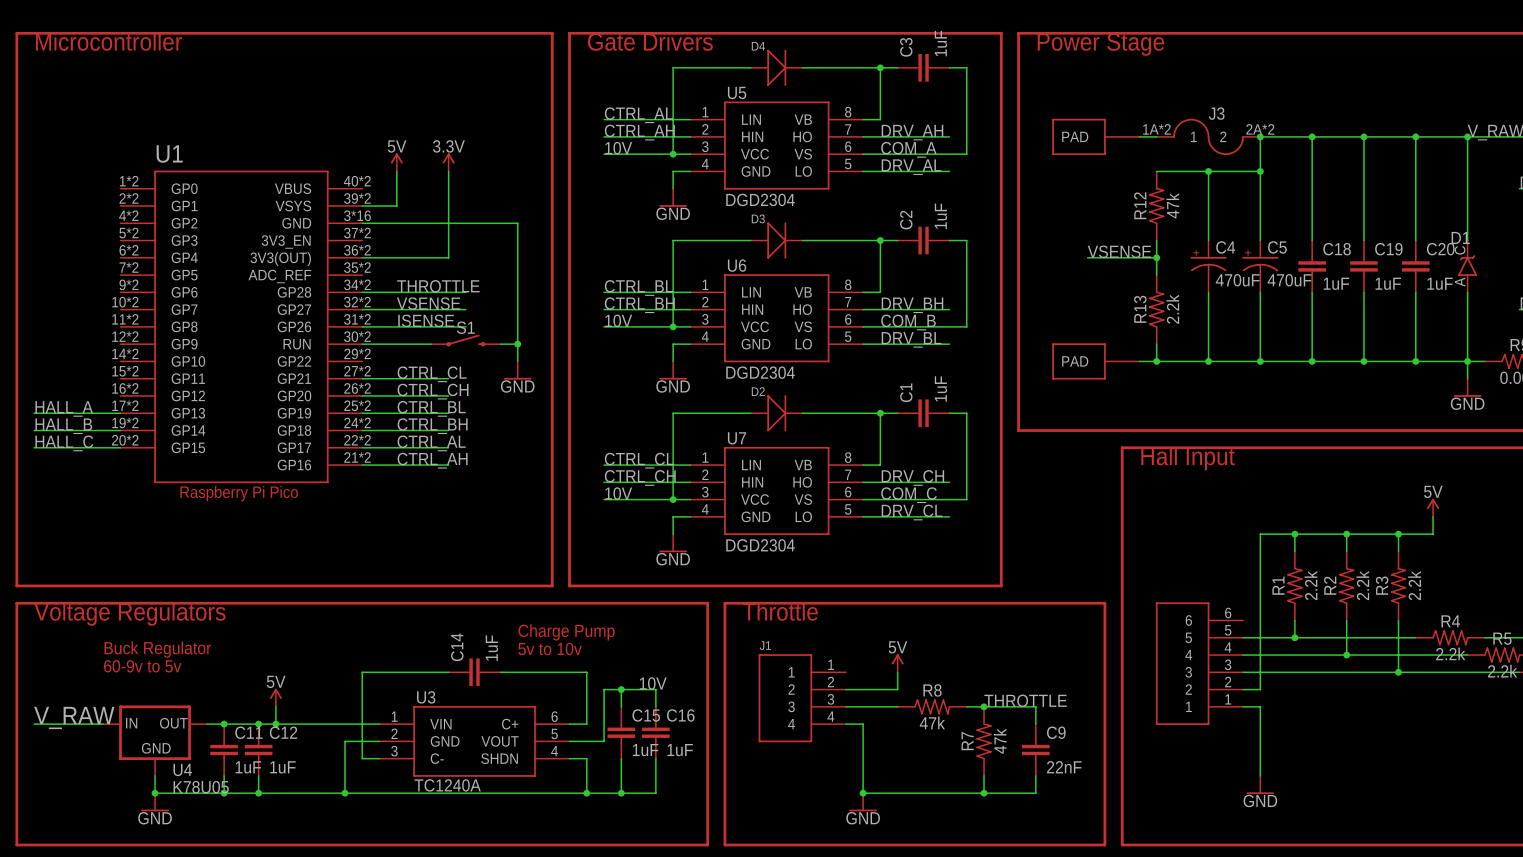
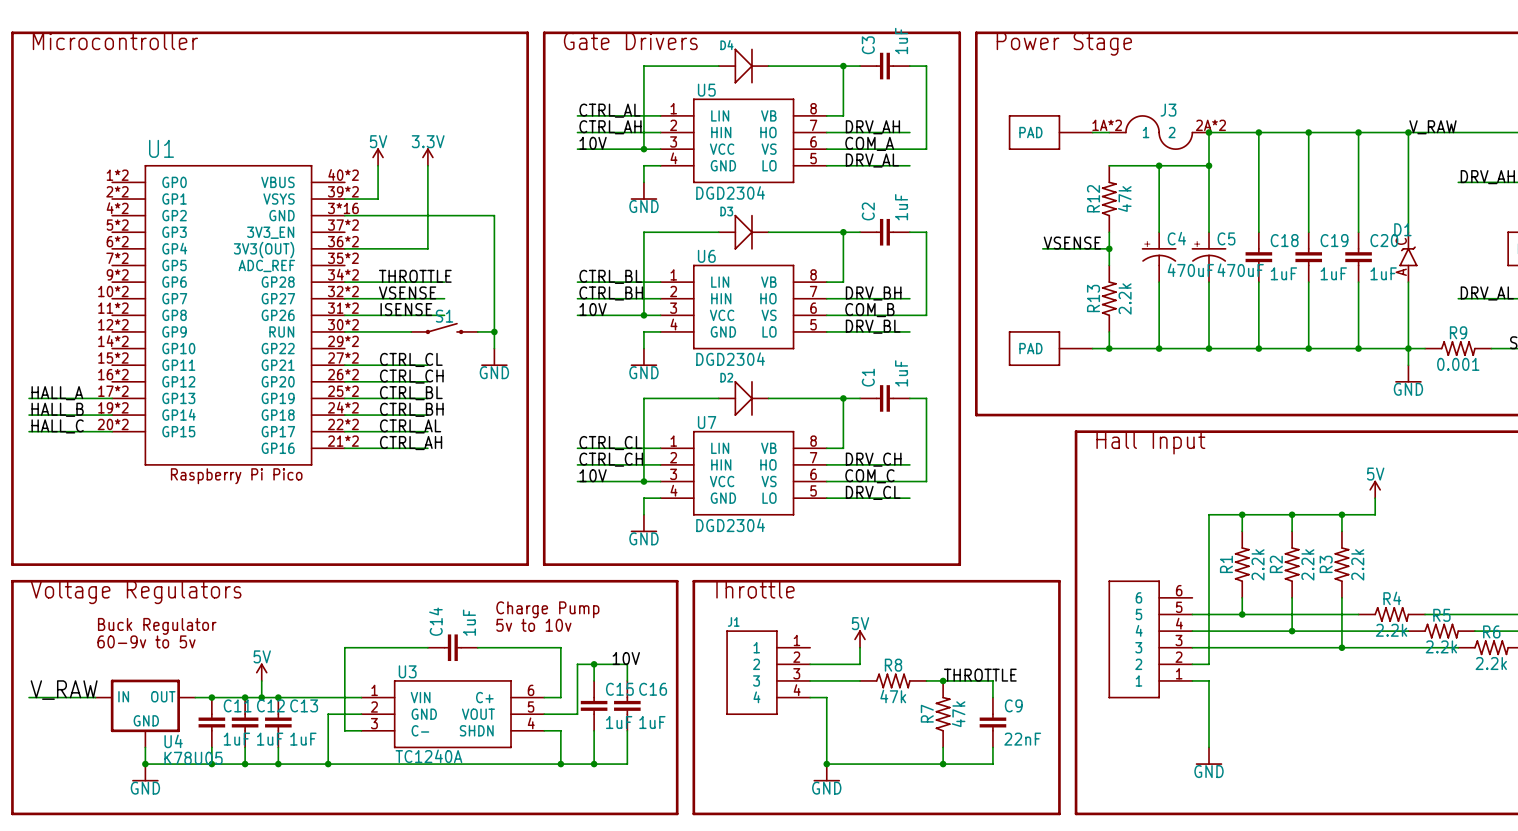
junction: none -> (278, 697)
C13: none -> 1uF (278, 722)
wire: none -> (278, 747) (278, 764)
junction: none -> (278, 764)

